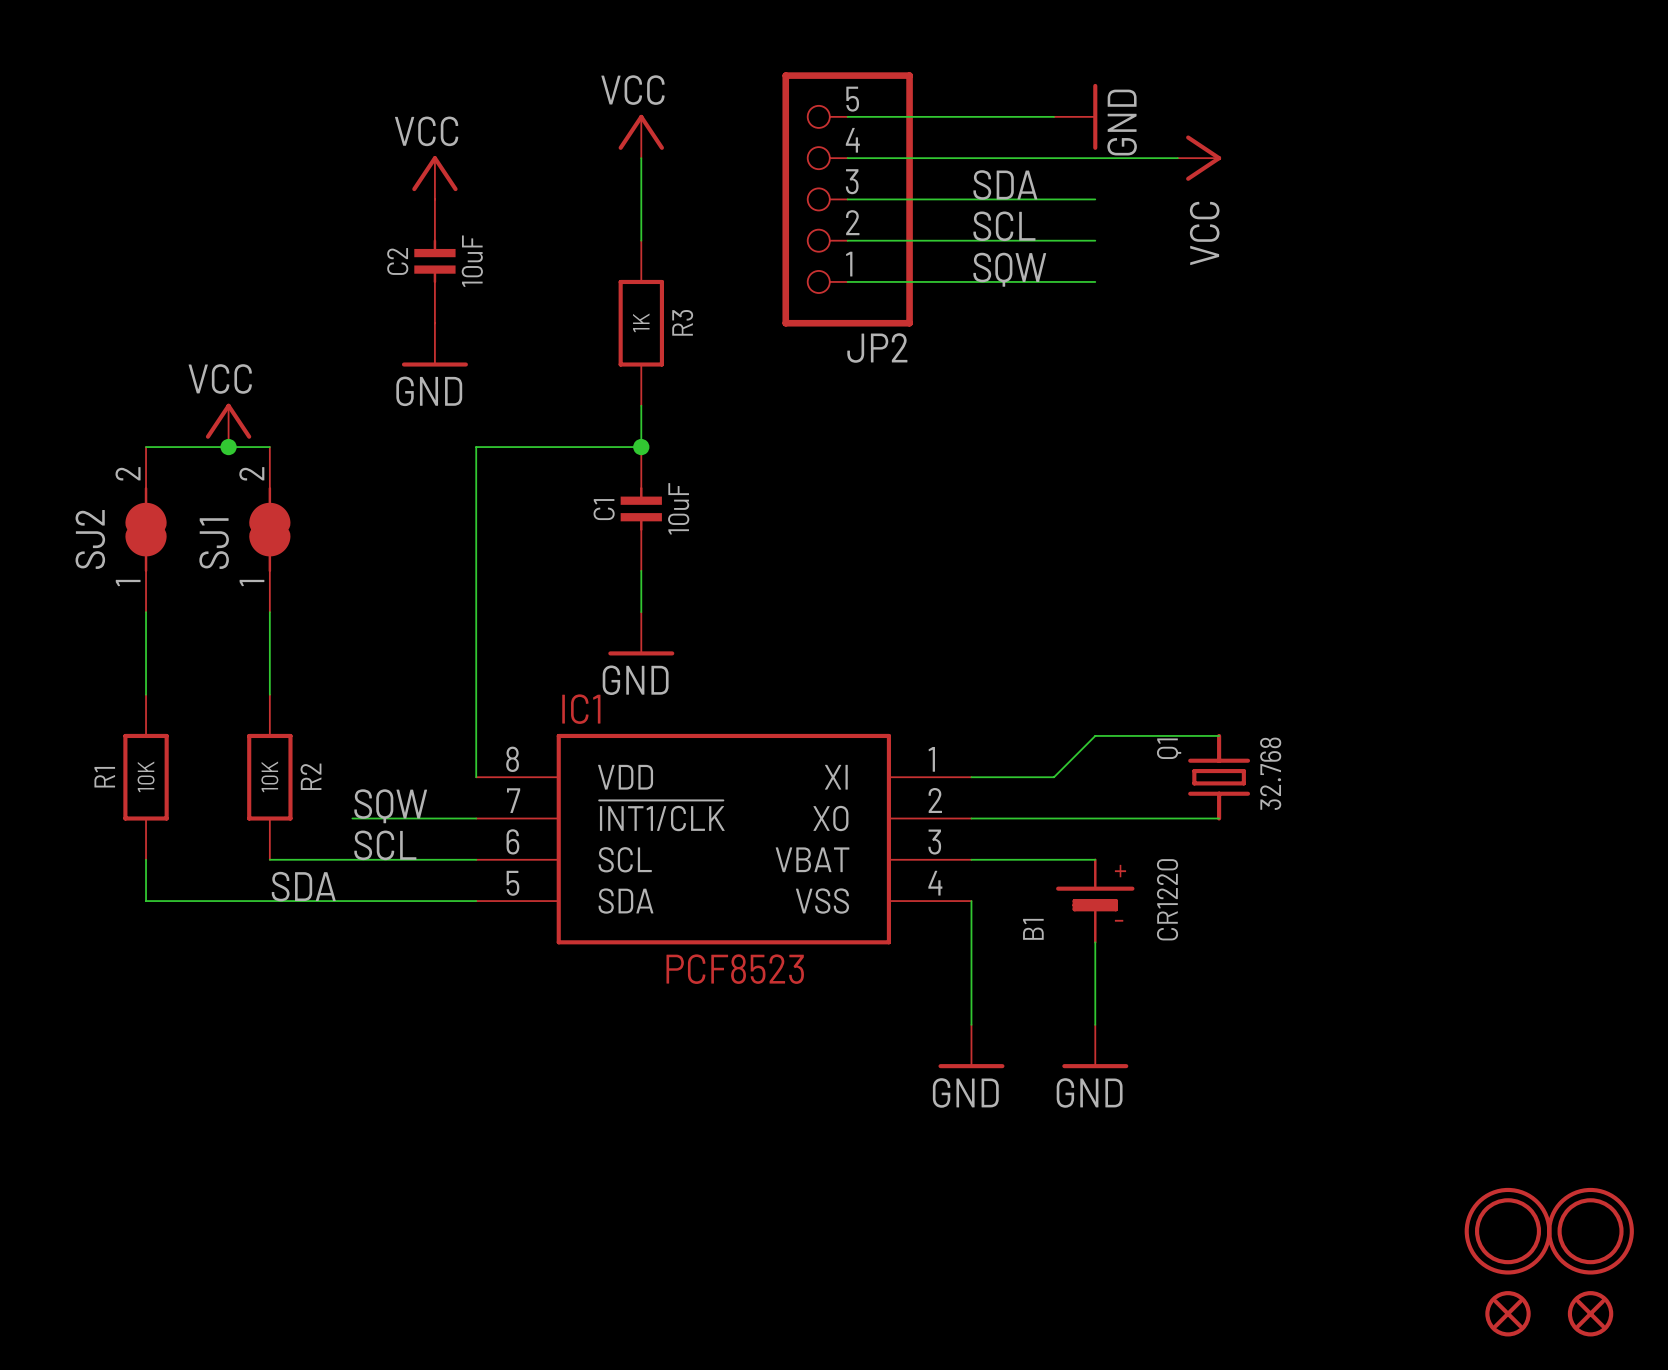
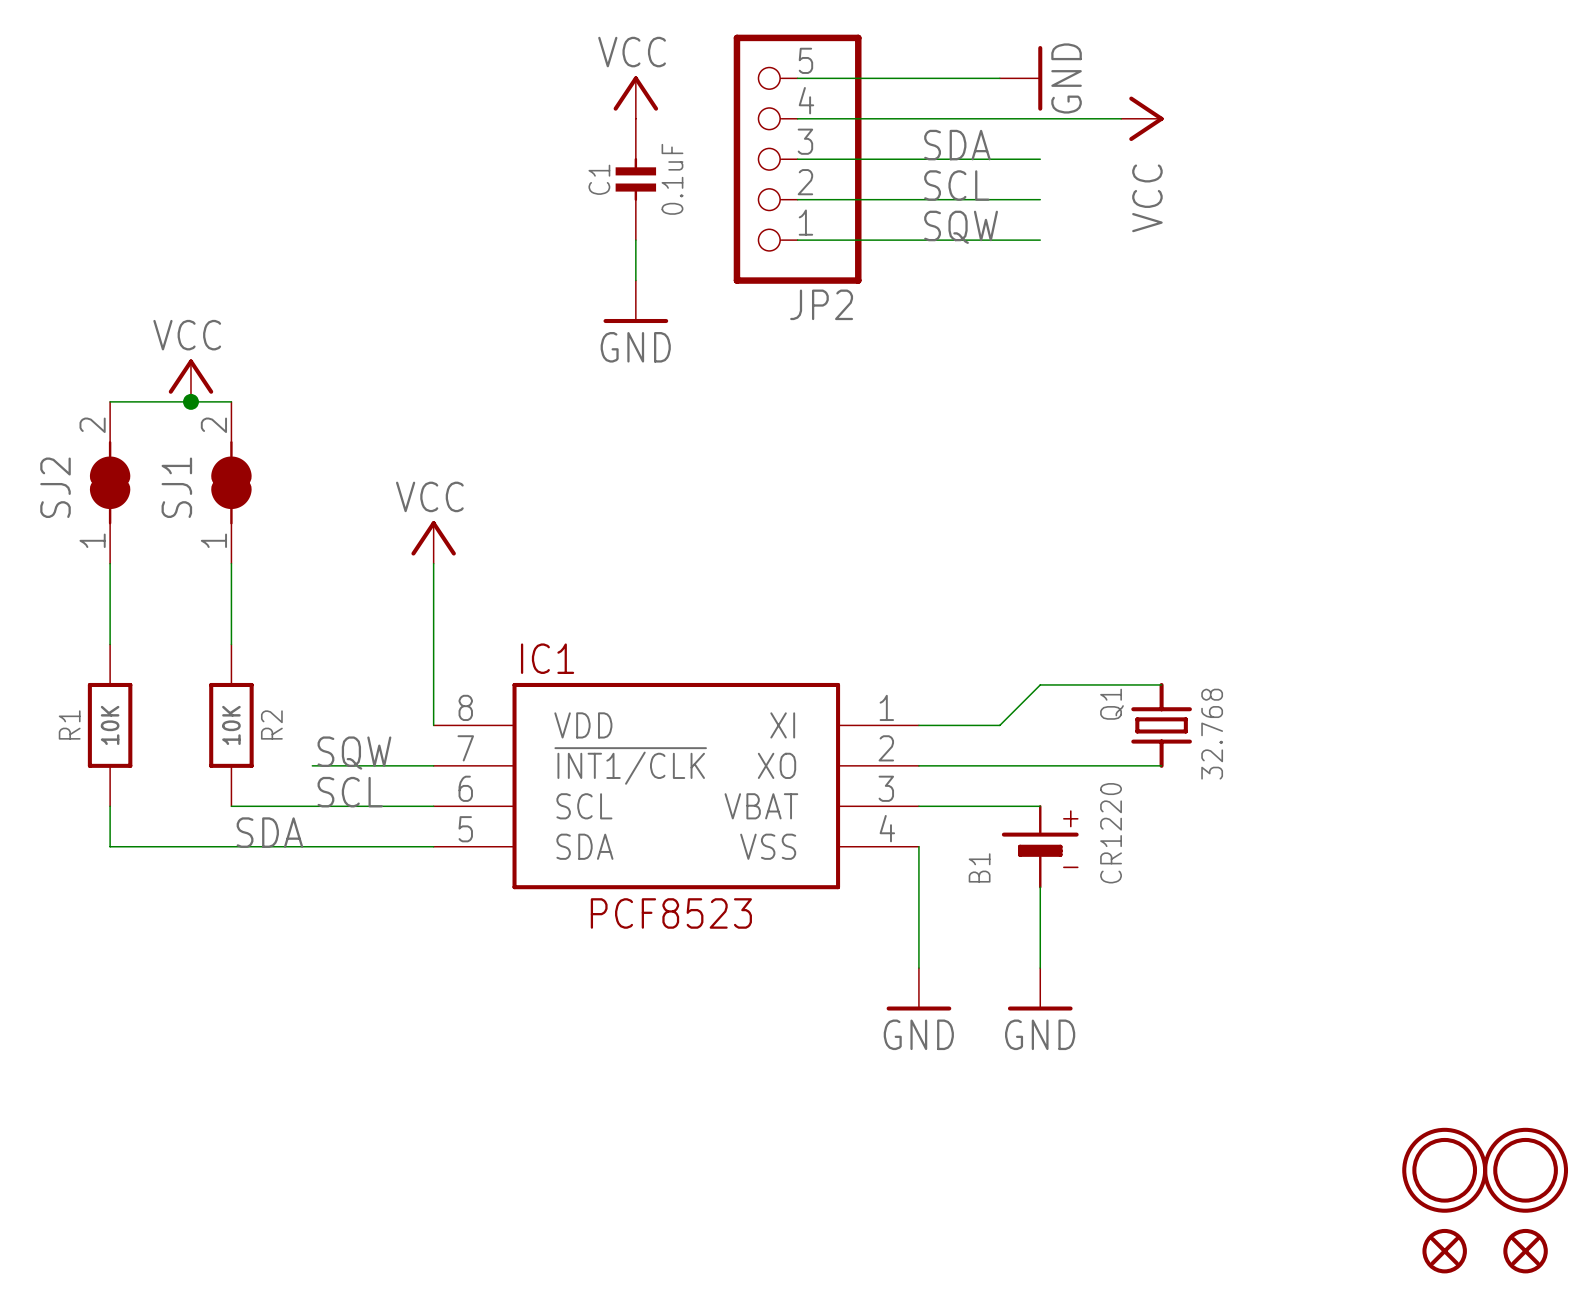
power symbol position: VCC (641, 136) -> VCC (635, 97)
wire: (641, 158) (641, 240) -> none
power symbol: VCC (434, 177) -> none
C2: 10uF (434, 261) -> none
R3: 1K (641, 323) -> none
power symbol: GND (434, 344) -> none
power symbol: none -> GND (635, 301)
wire: (641, 405) (641, 447) (476, 447) (476, 612) -> none
junction: (641, 447) -> none
C1 position: (641, 508) -> (635, 179)
C1 value: 10uF (678, 508) -> 0.1uF (672, 179)
wire: (641, 570) (641, 612) -> (635, 240) (635, 280)
power symbol: none -> VCC (433, 542)
power symbol: GND (641, 633) -> none

